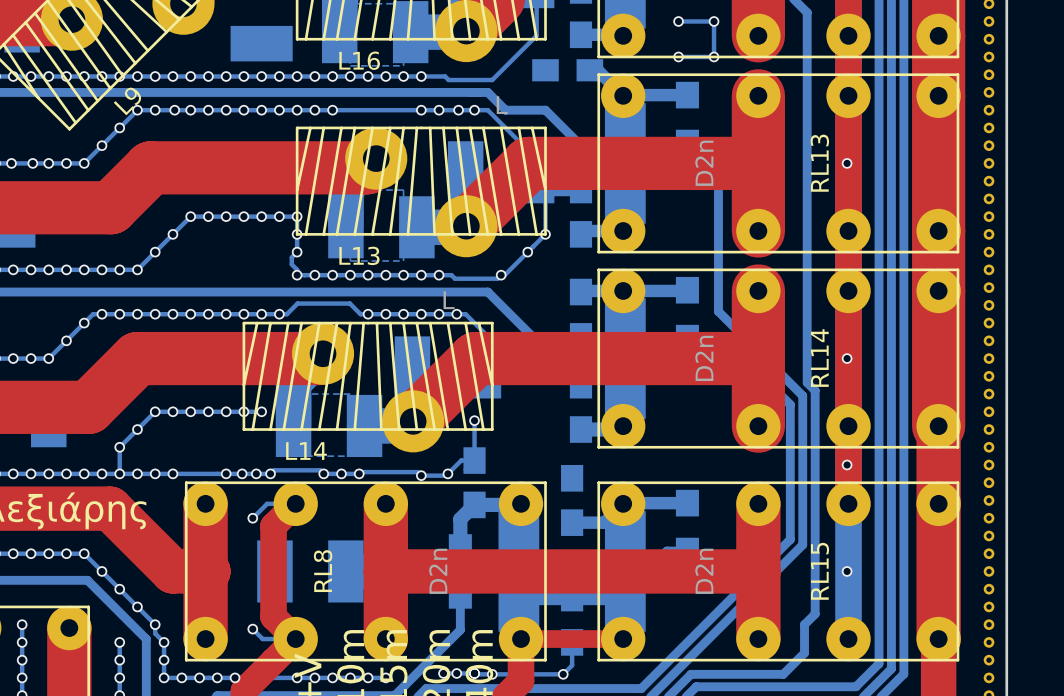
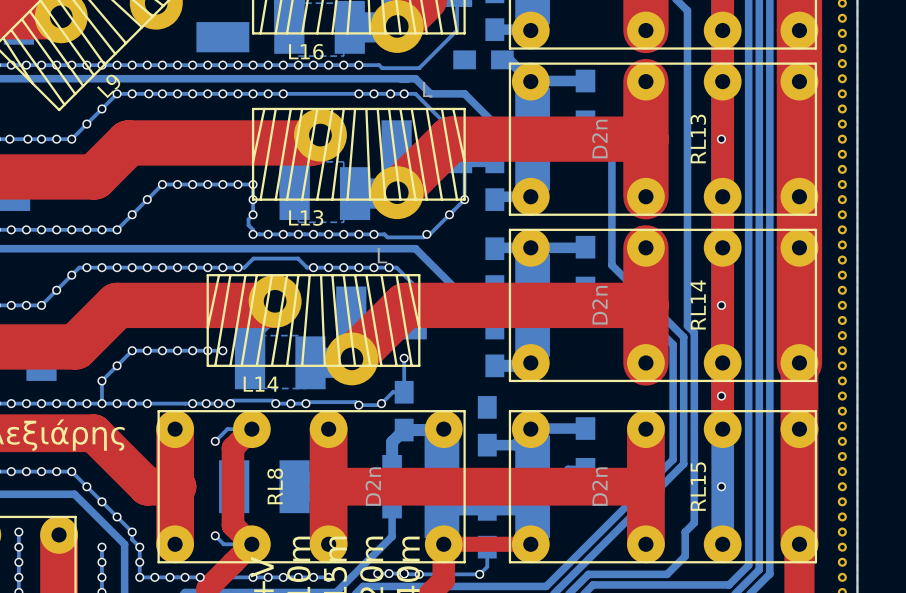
bottom track: (678, 21) (714, 21) (714, 56) (678, 56) -> none
via: (678, 21) -> none
via: (714, 21) -> none
via: (678, 56) -> none
via: (714, 56) -> none

